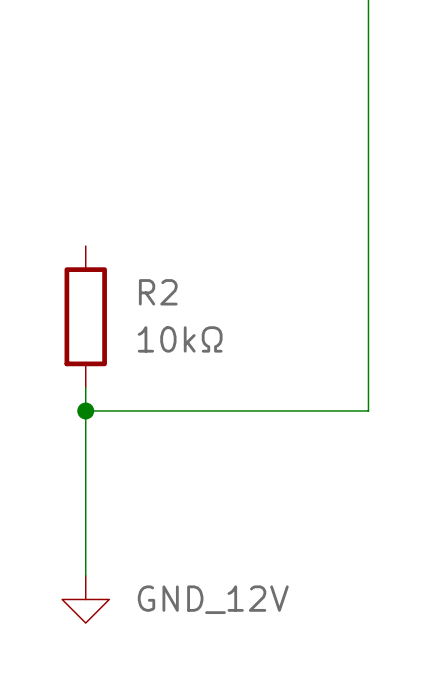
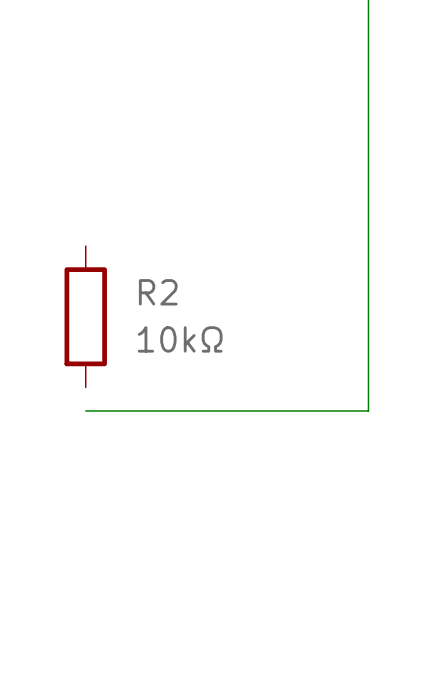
wire: (85, 387) (85, 575) -> none
junction: (85, 410) -> none
power symbol: GND_12V (85, 599) -> none

